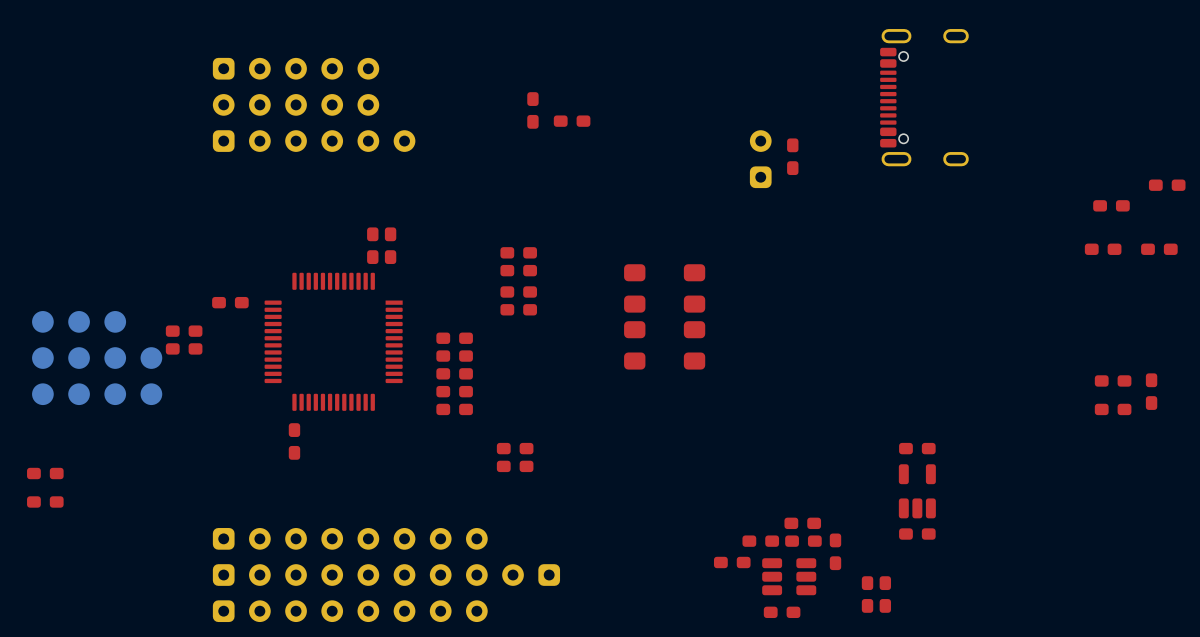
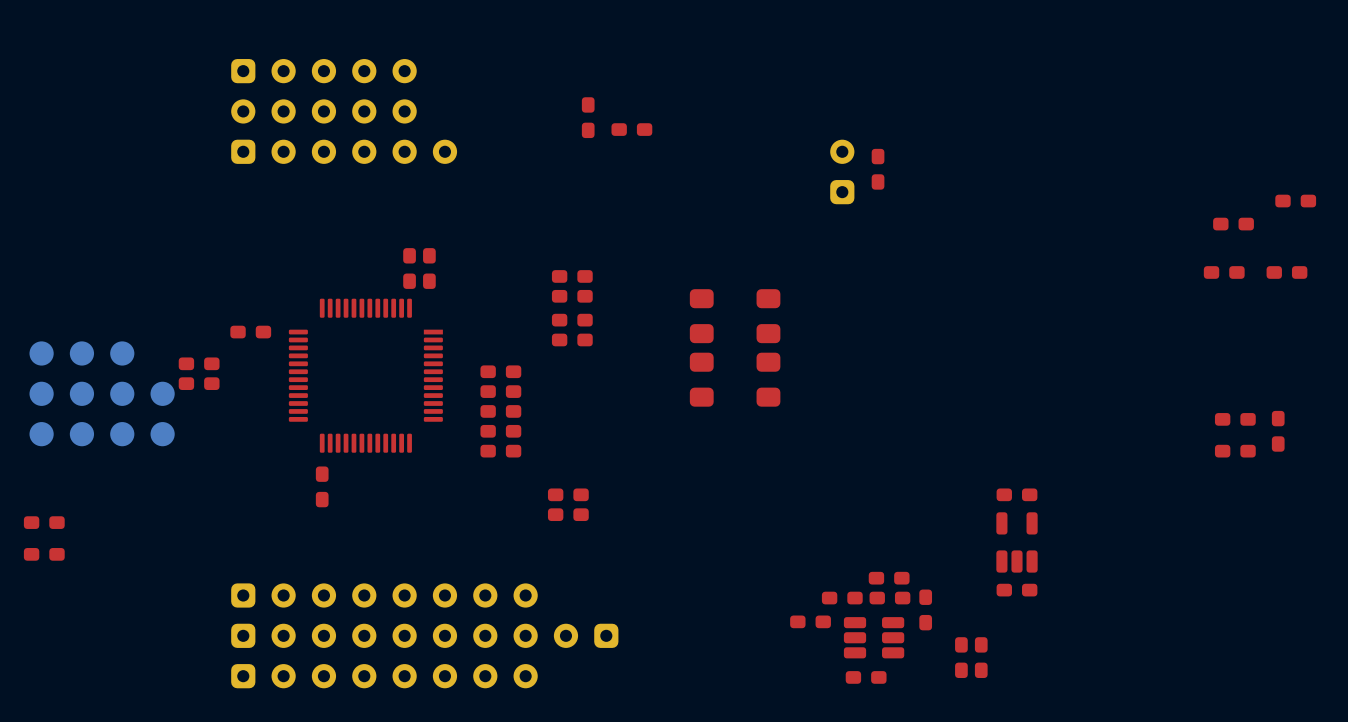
part: (924, 97) -> none

